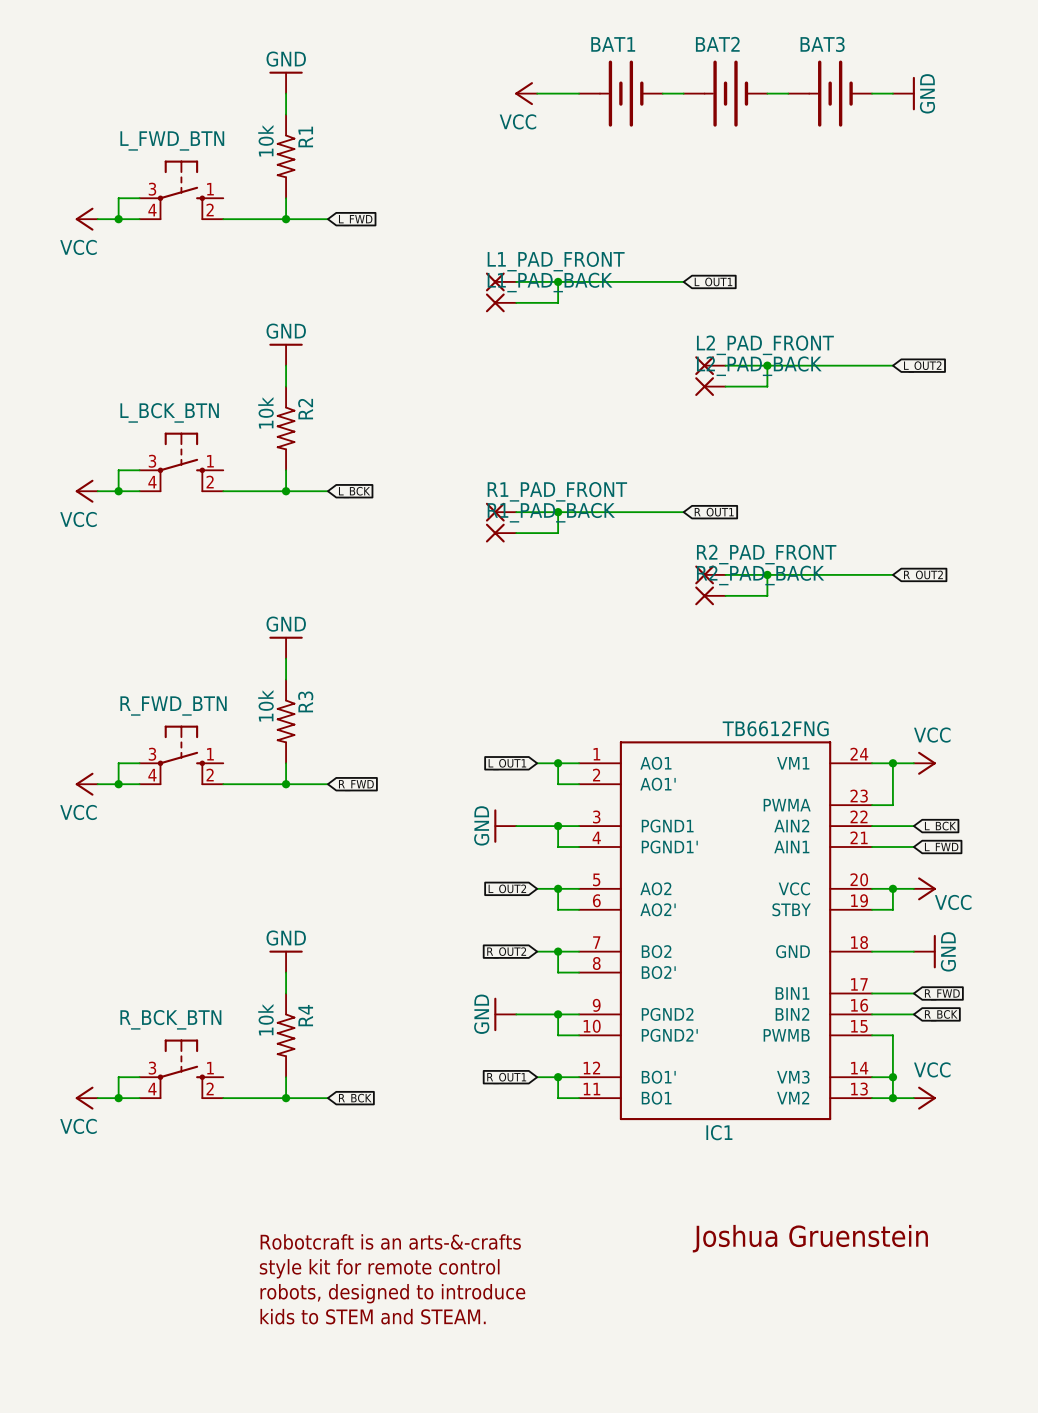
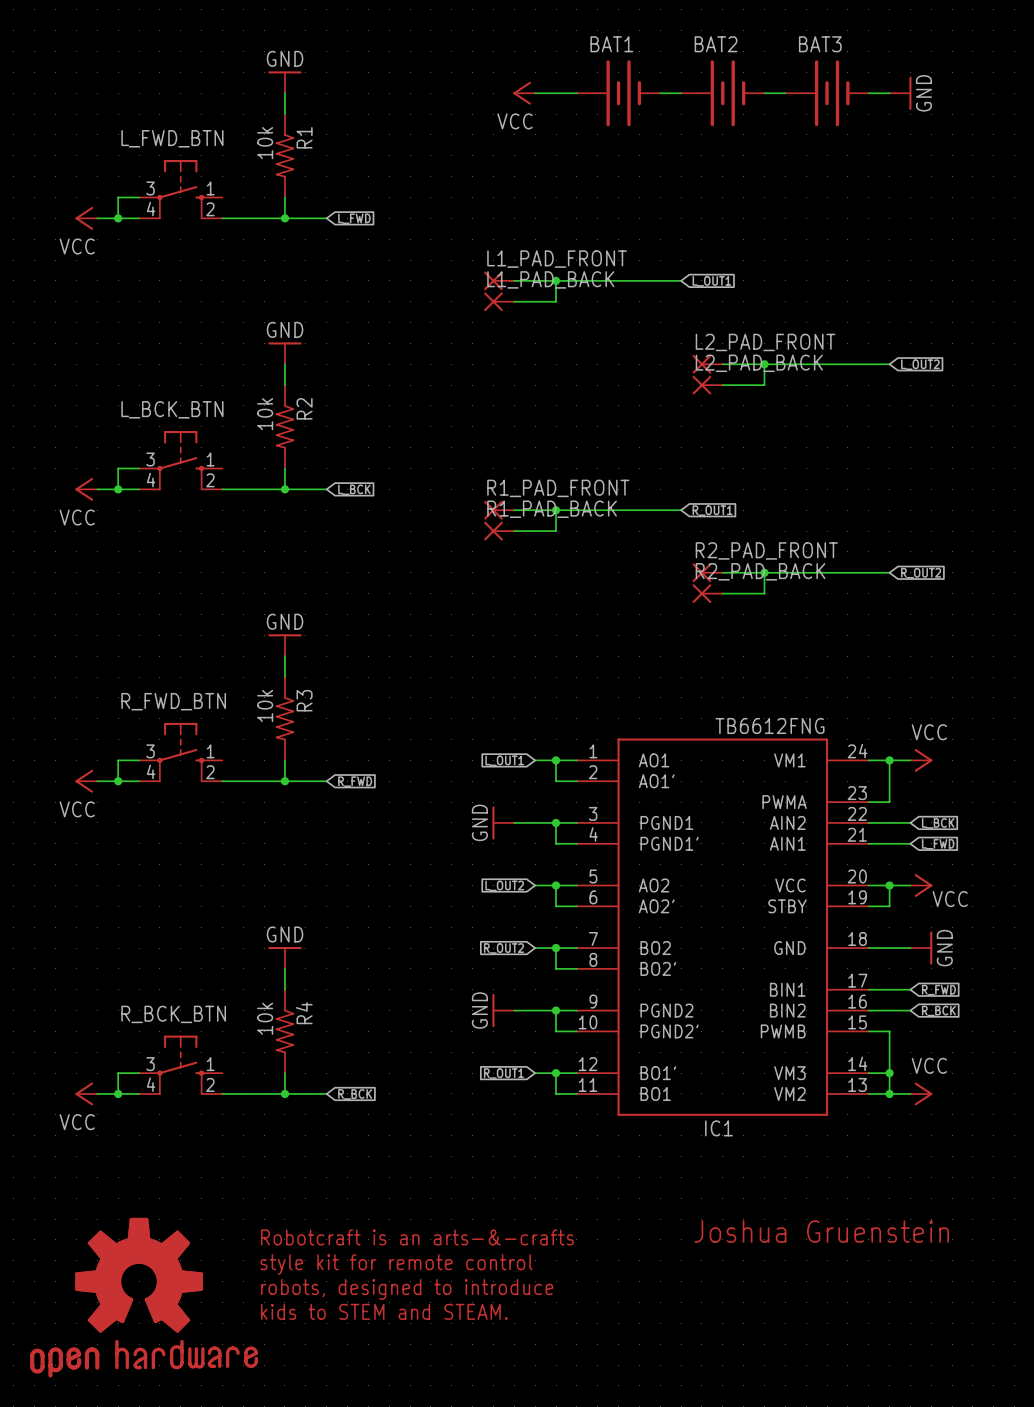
part: none -> (144, 1297)

